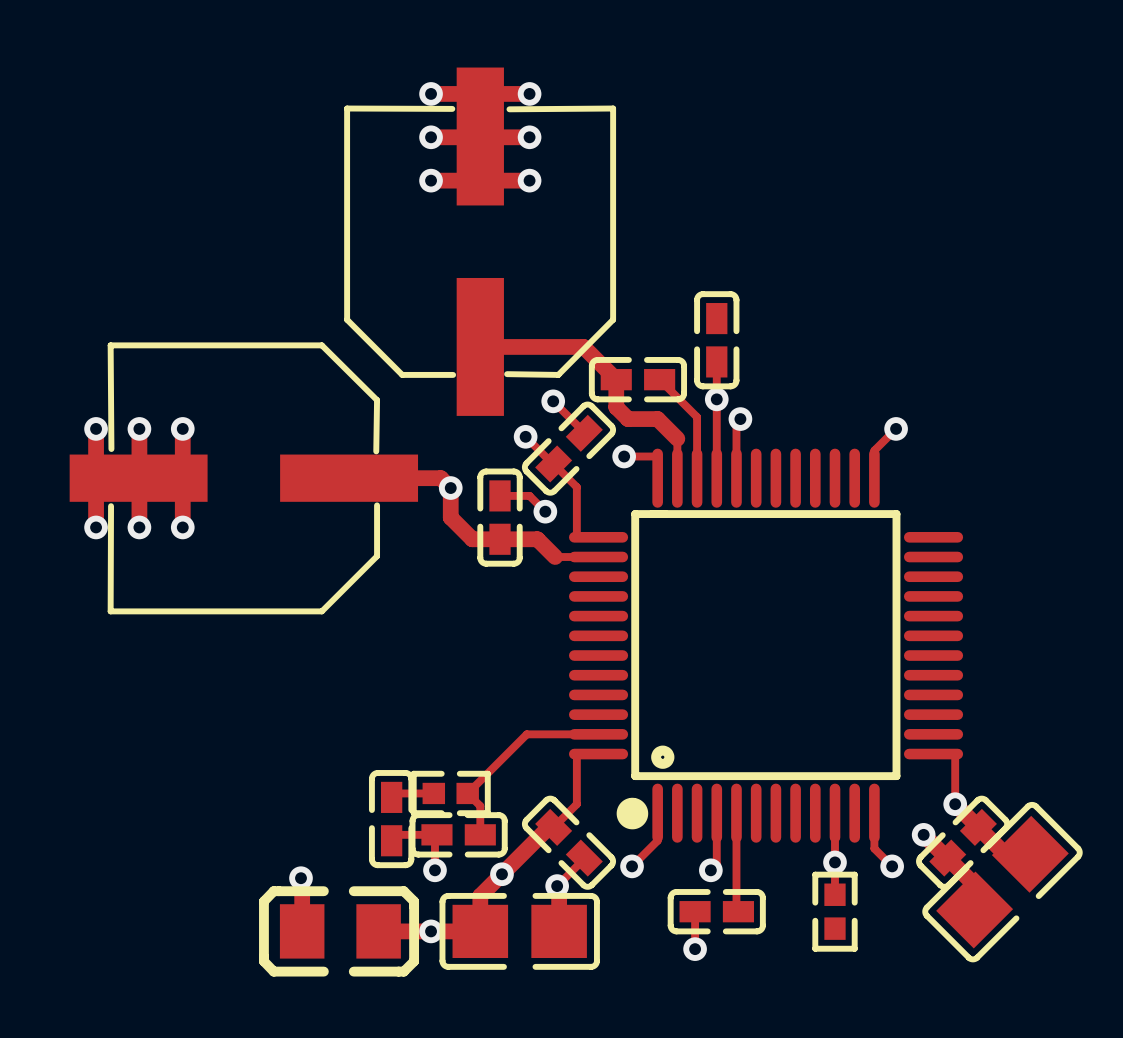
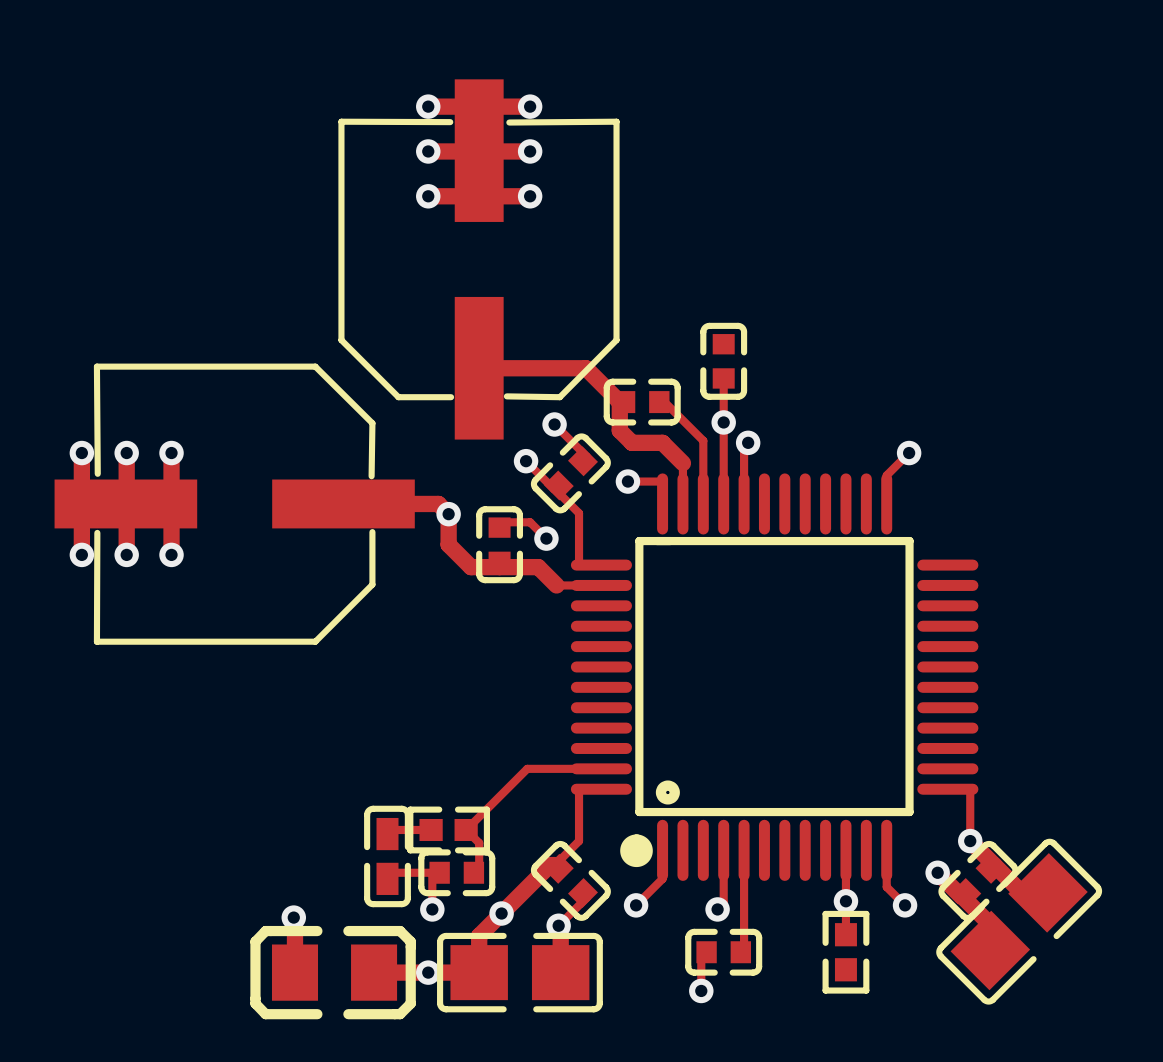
part footprint: [694, 291, 740, 390] -> [700, 322, 748, 400]
part footprint: [588, 357, 688, 403] -> [603, 378, 681, 426]
part footprint: [521, 401, 617, 496] -> [530, 433, 611, 514]
part footprint: [477, 468, 523, 567] -> [476, 506, 524, 584]
part footprint: [521, 795, 617, 890] -> [530, 840, 611, 921]
part footprint: [916, 795, 1011, 890] -> [938, 840, 1019, 921]
part footprint: [409, 812, 508, 858] -> [418, 849, 496, 897]
part footprint: [667, 889, 766, 935] -> [685, 928, 763, 976]

